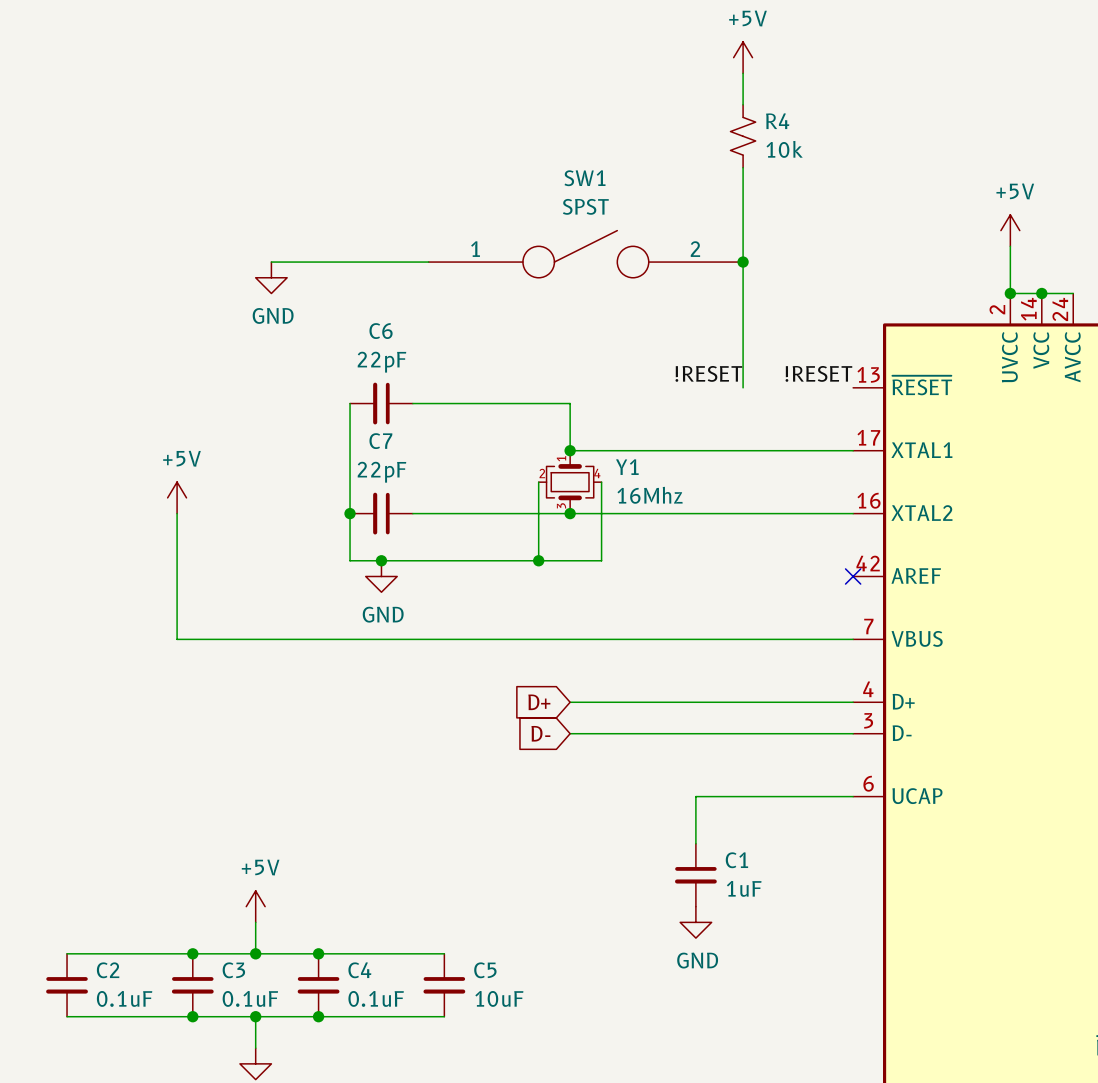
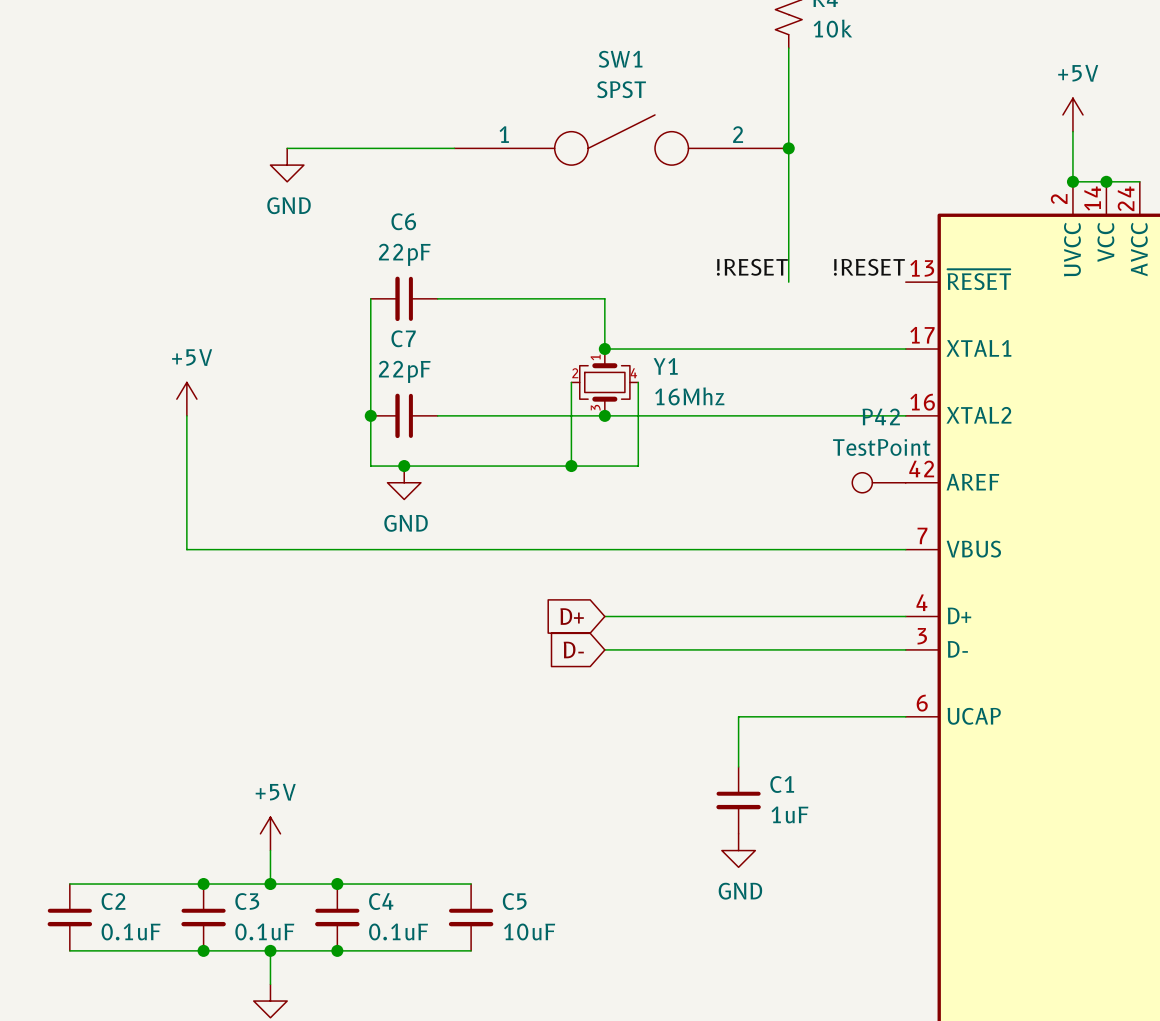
P42: none -> TestPoint (879, 482)
no-connect mark: (853, 576) -> none

